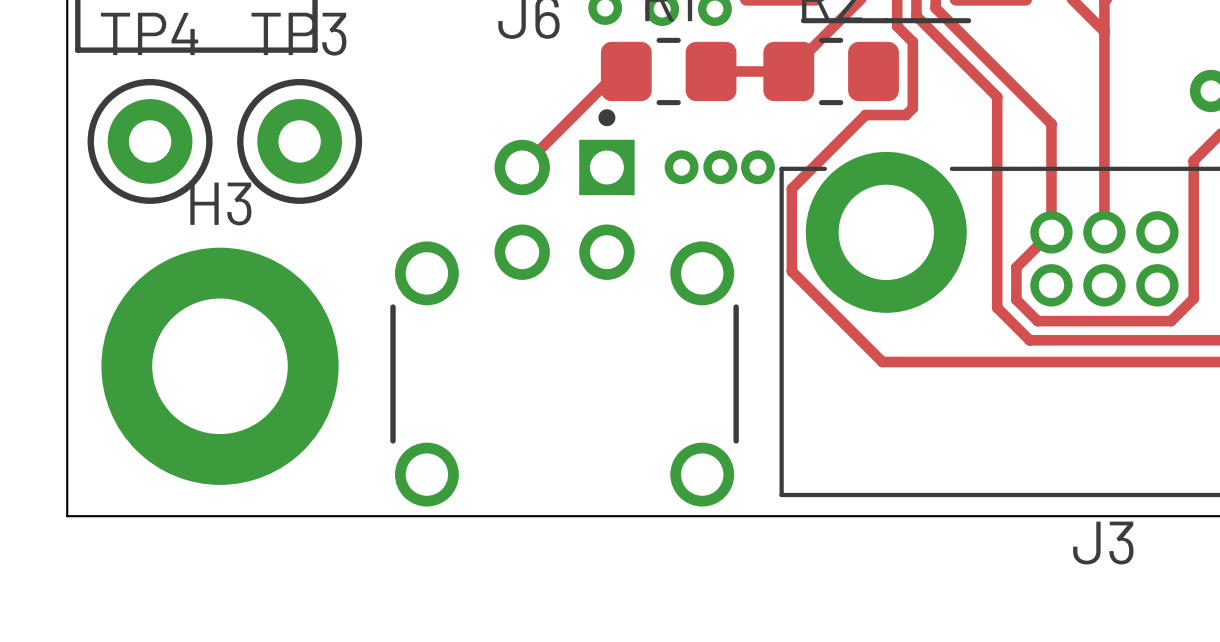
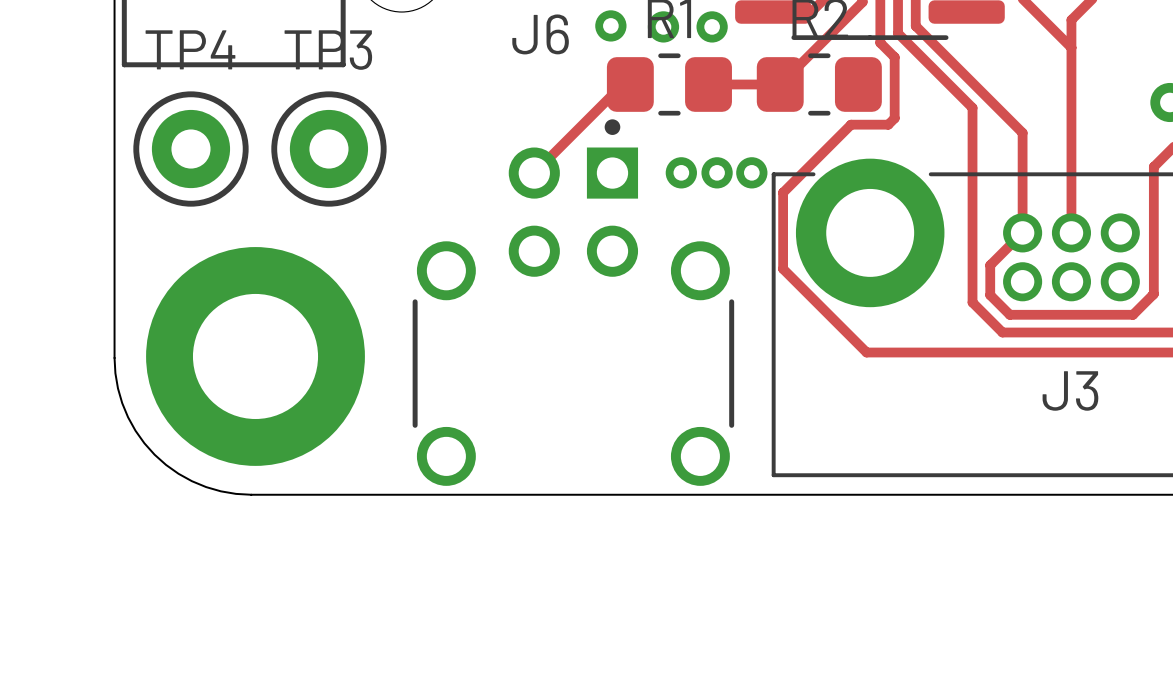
H3 name: H3 (220, 203) -> none
board edge: (67, 367) (67, 516) (215, 516) -> (114, 357) (117, 388) (128, 417) (135, 430) (154, 454) (178, 473) (206, 487) (236, 493) (251, 494)
J3 name position: J3 (1103, 543) -> J3 (1070, 390)

